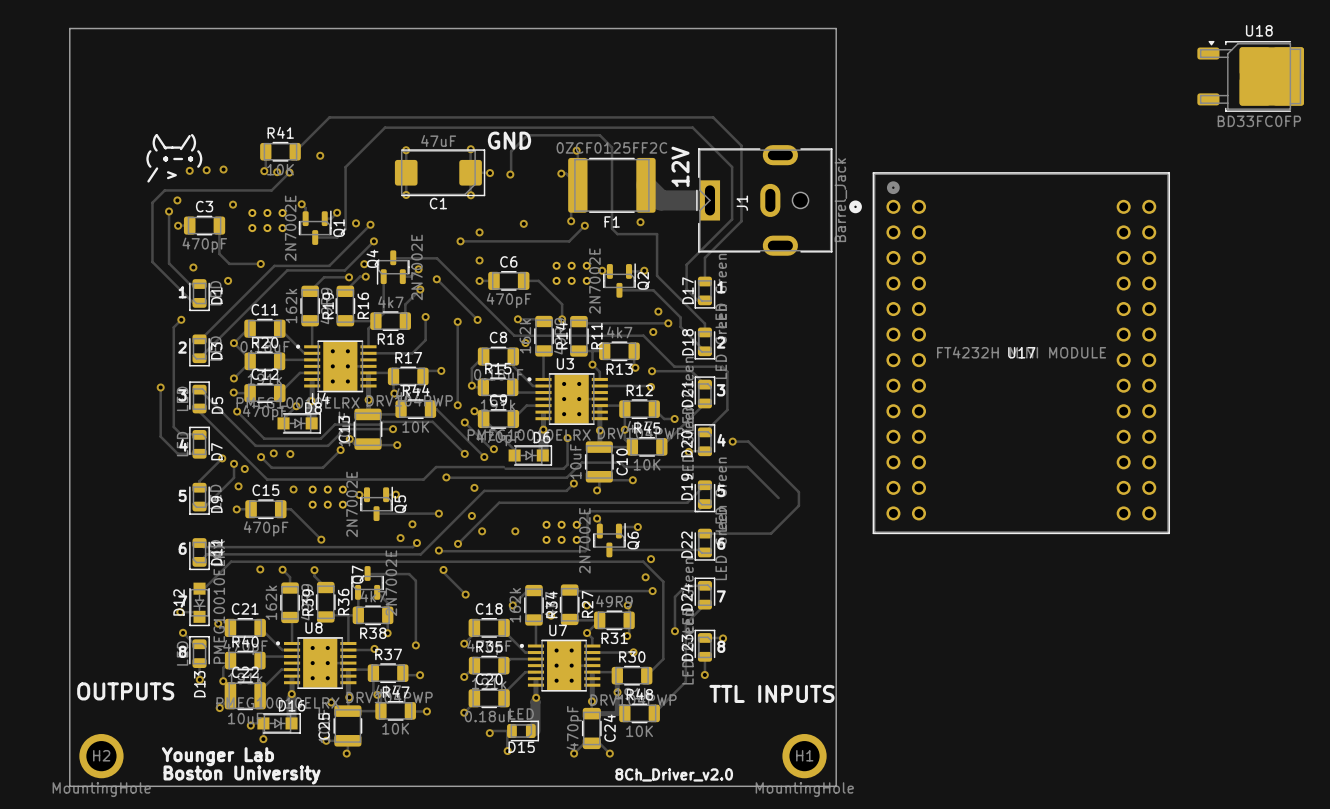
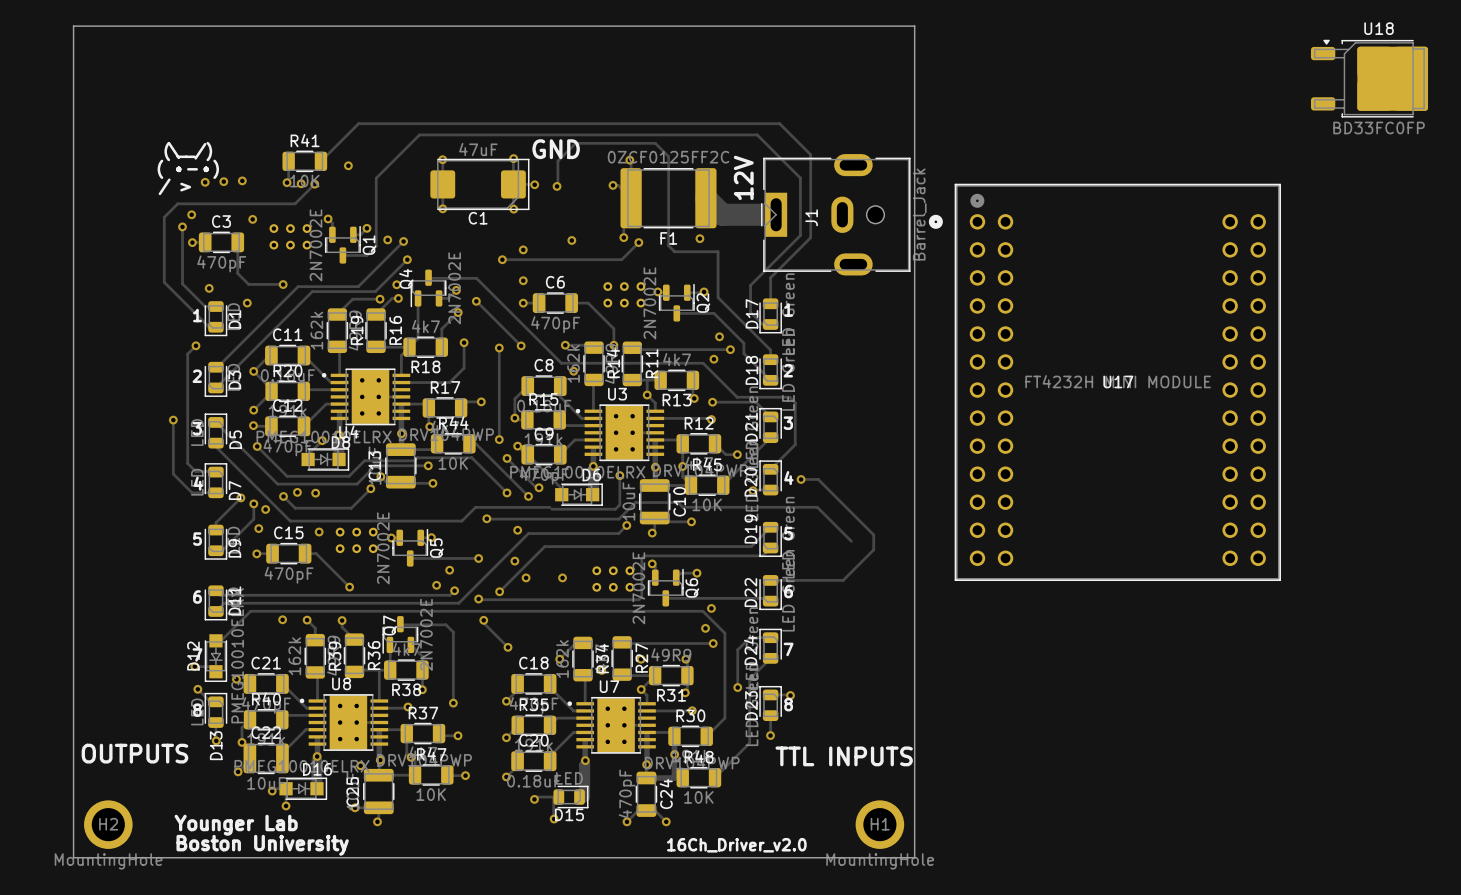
text: 8Ch_Driver_v2.0 (674, 774) -> 16Ch_Driver_v2.0 (736, 845)

